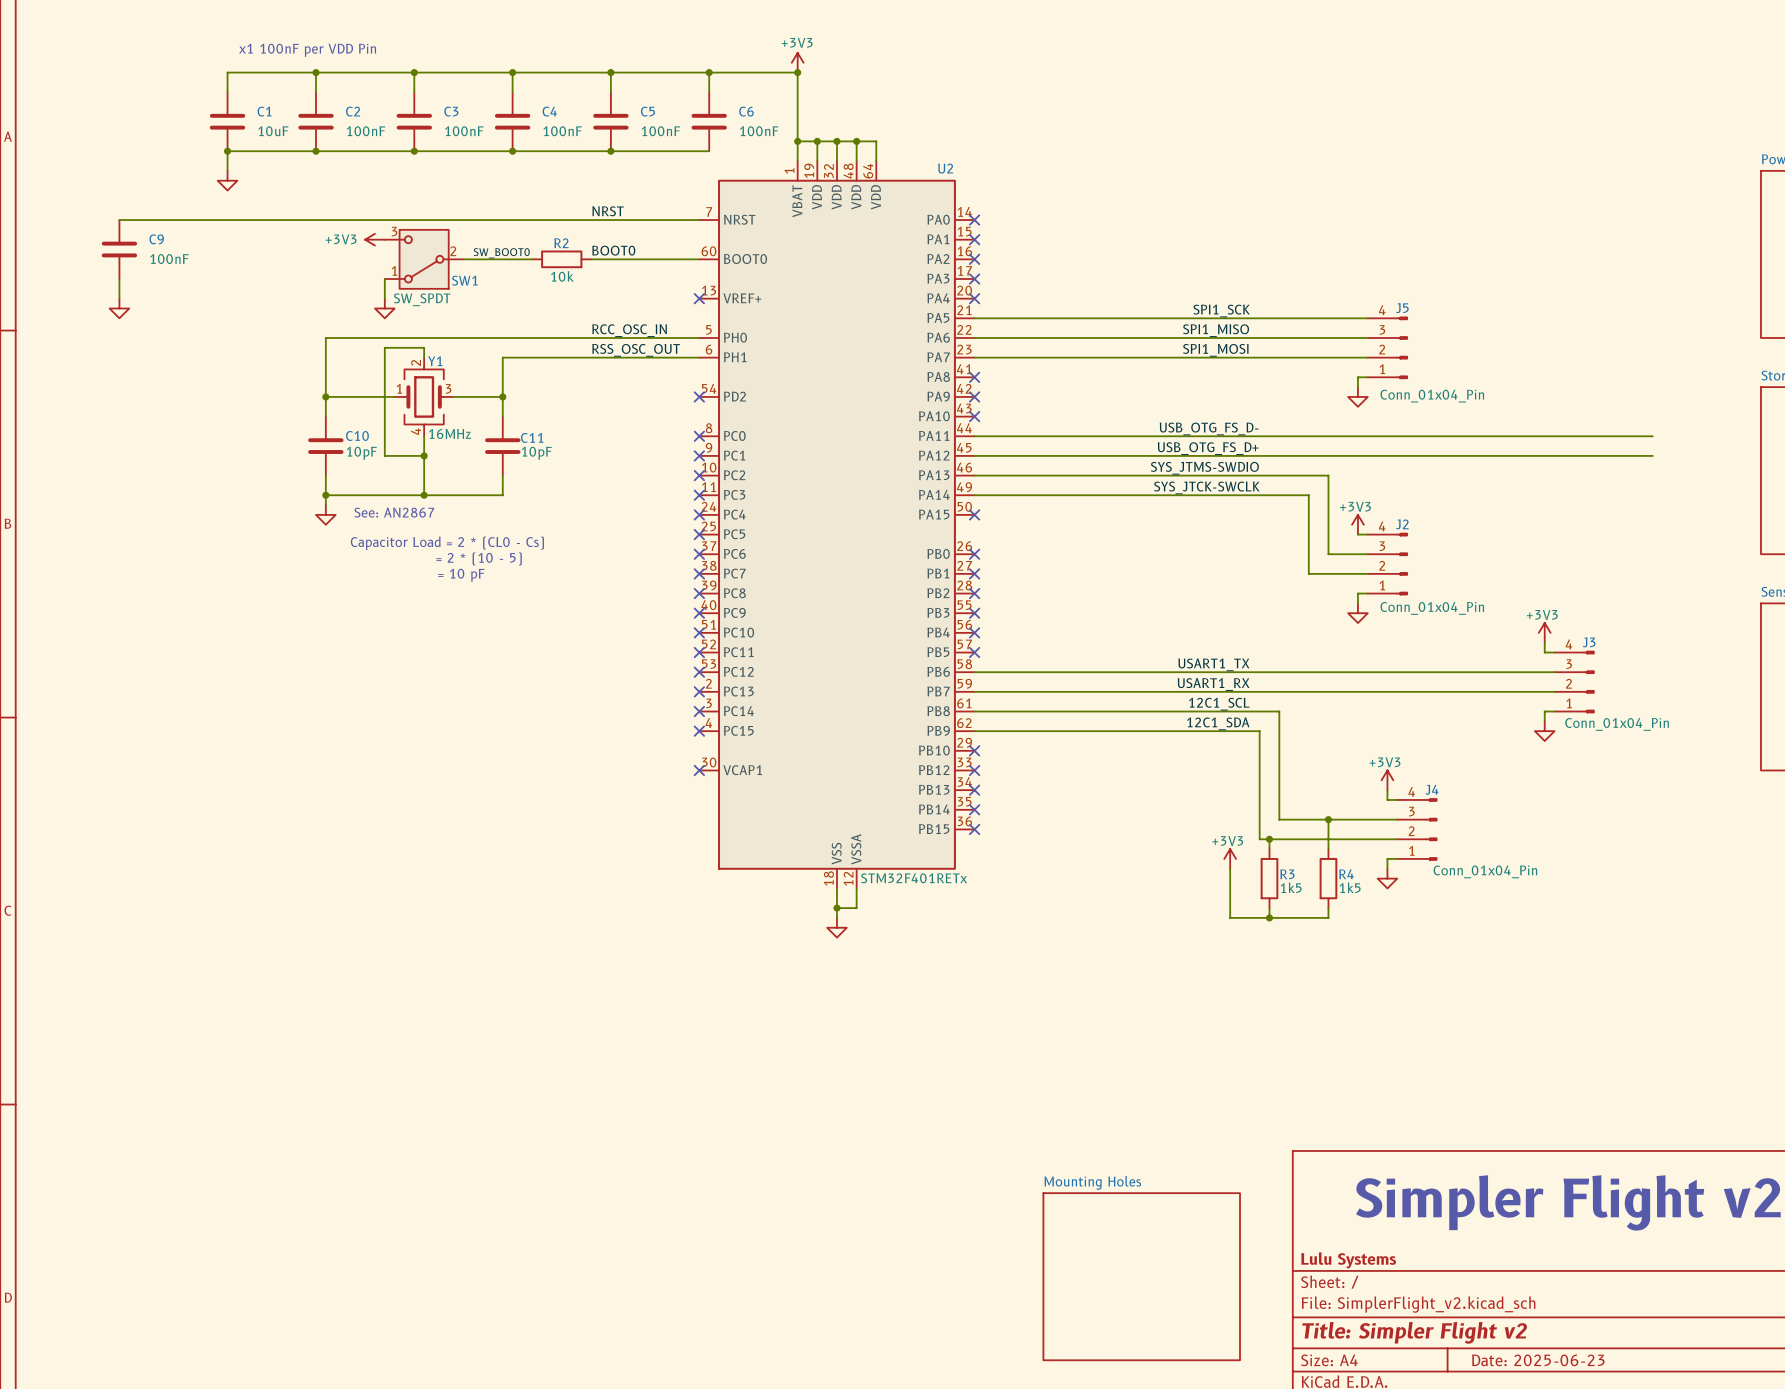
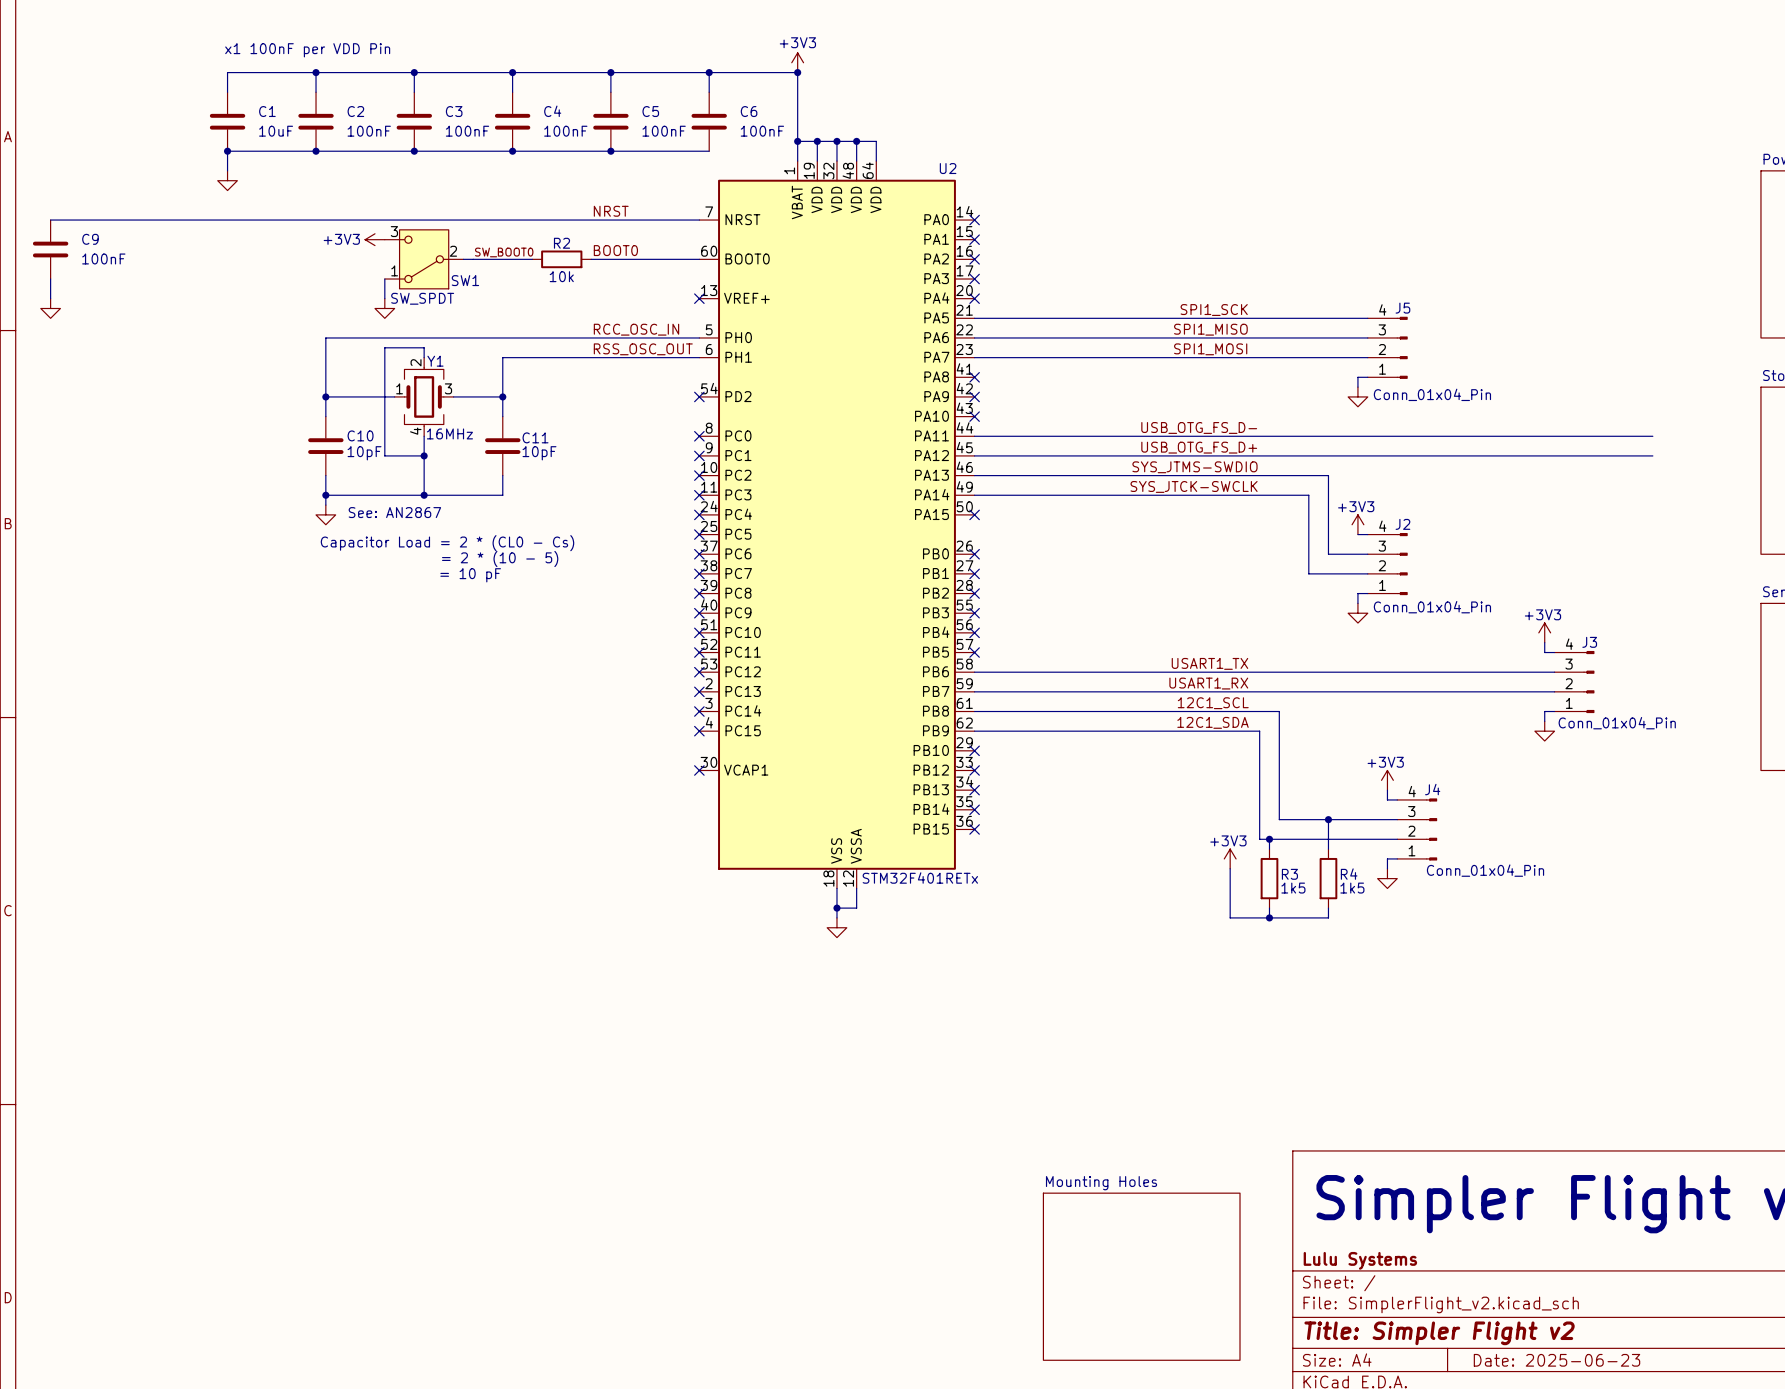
wire: none -> (50, 220) (119, 220)
C9 position: (119, 249) -> (50, 249)
wire: (119, 279) (119, 298) -> (50, 279) (50, 298)
power symbol position: (119, 308) -> (50, 308)

